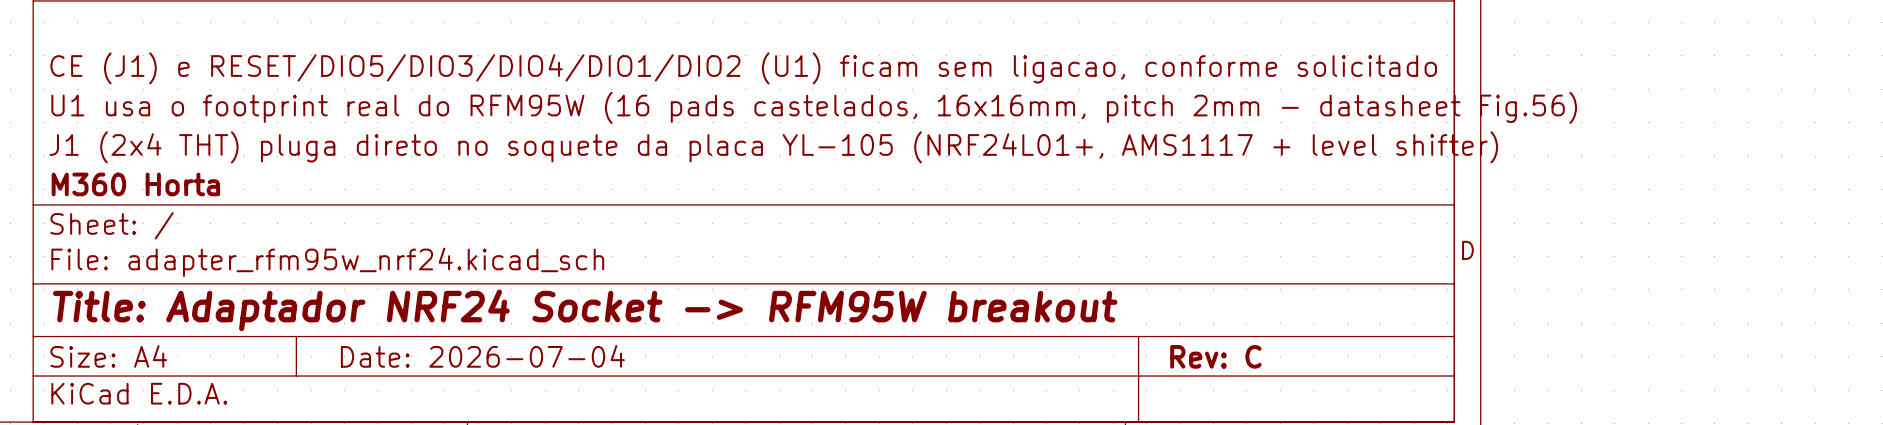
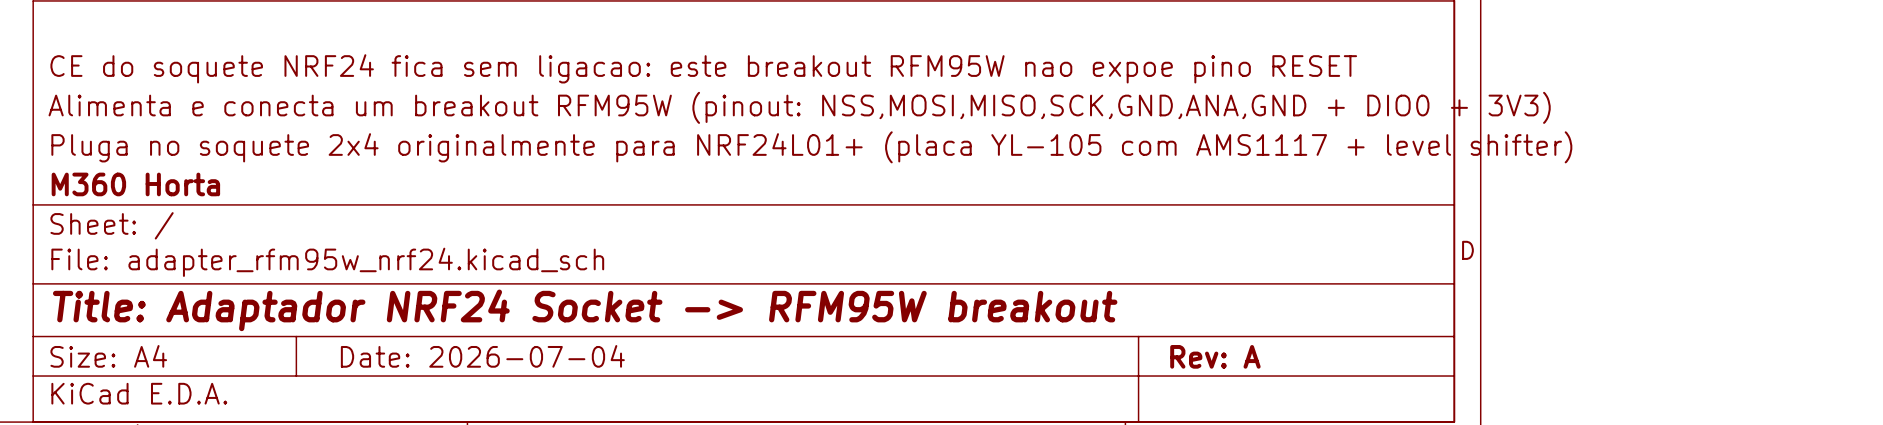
title block: CE (J1) e RESET/DIO5/DIO3/DIO4/DIO1/DIO2 (U1) ficam sem ligacao, conforme solicitado (743, 68) -> CE do soquete NRF24 fica sem ligacao: este breakout RFM95W nao expoe pino RESET (703, 68)
title block: U1 usa o footprint real do RFM95W (16 pads castelados, 16x16mm, pitch 2mm - datasheet Fig.56) (814, 107) -> Alimenta e conecta um breakout RFM95W (pinout: NSS,MOSI,MISO,SCK,GND,ANA,GND + DIO0 + 3V3) (799, 107)
title block: J1 (2x4 THT) pluga direto no soquete da placa YL-105 (NRF24L01+, AMS1117 + level shifter) (773, 147) -> Pluga no soquete 2x4 originalmente para NRF24L01+ (placa YL-105 com AMS1117 + level shifter) (811, 147)
title block: Rev: C (1215, 356) -> Rev: A (1215, 356)

